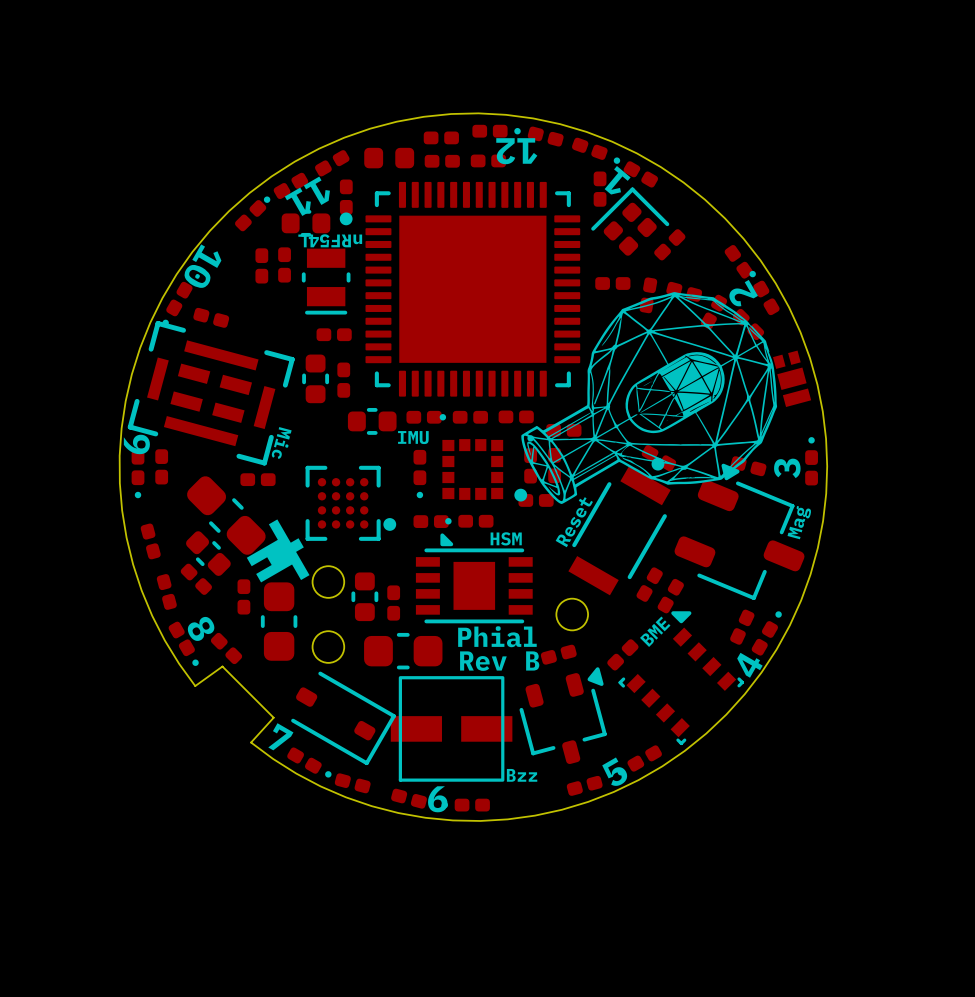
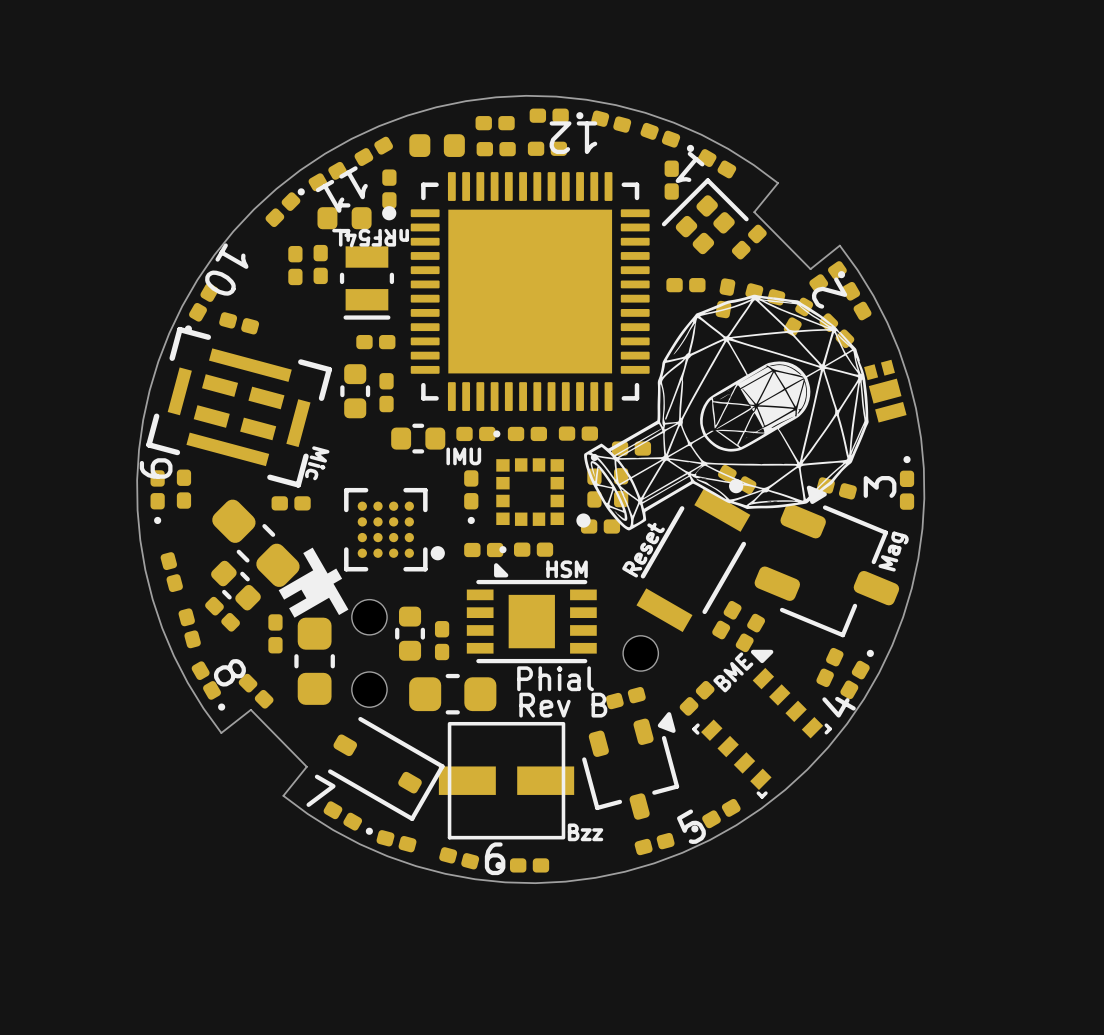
part rotation: 0° (738, 261) -> 90° clockwise (828, 276)
board edge: (222, 666) (273, 717) (251, 742) (273, 758) (320, 786) (345, 797) (371, 806) (425, 817) (480, 820) (507, 819) (561, 809) (613, 791) (638, 780) (662, 766) (706, 733) (744, 694) (761, 672) (789, 625) (801, 600) (817, 548) (826, 493) (826, 438) (822, 411) (809, 358) (789, 307) (760, 260) (743, 238) (705, 199) (660, 167) (637, 153) (586, 131) (560, 124) (506, 114) (451, 114) (423, 116) (370, 128) (319, 148) (271, 176) (249, 192) (229, 211) (192, 252) (176, 274) (150, 322) (131, 374) (121, 428) (119, 455) (119, 483) (126, 537) (133, 564) (152, 615) (164, 640) (195, 686) (222, 666) -> (778, 183) (754, 212) (810, 269) (839, 245) (857, 270) (873, 295) (899, 350) (916, 408) (923, 468) (924, 498) (918, 558) (903, 617) (879, 672) (847, 723) (828, 747) (785, 789) (736, 825) (709, 840) (682, 852) (625, 871) (565, 881) (505, 882) (445, 873) (416, 866) (359, 844) (333, 830) (283, 795) (306, 766) (250, 709) (221, 733) (203, 708) (173, 655) (152, 599) (140, 540) (137, 510) (139, 449) (143, 419) (158, 361) (169, 333) (197, 279) (233, 231) (276, 188) (325, 153) (351, 138) (407, 115) (465, 101) (495, 97) (556, 96) (616, 105) (645, 112) (673, 122) (728, 148) (778, 183)

